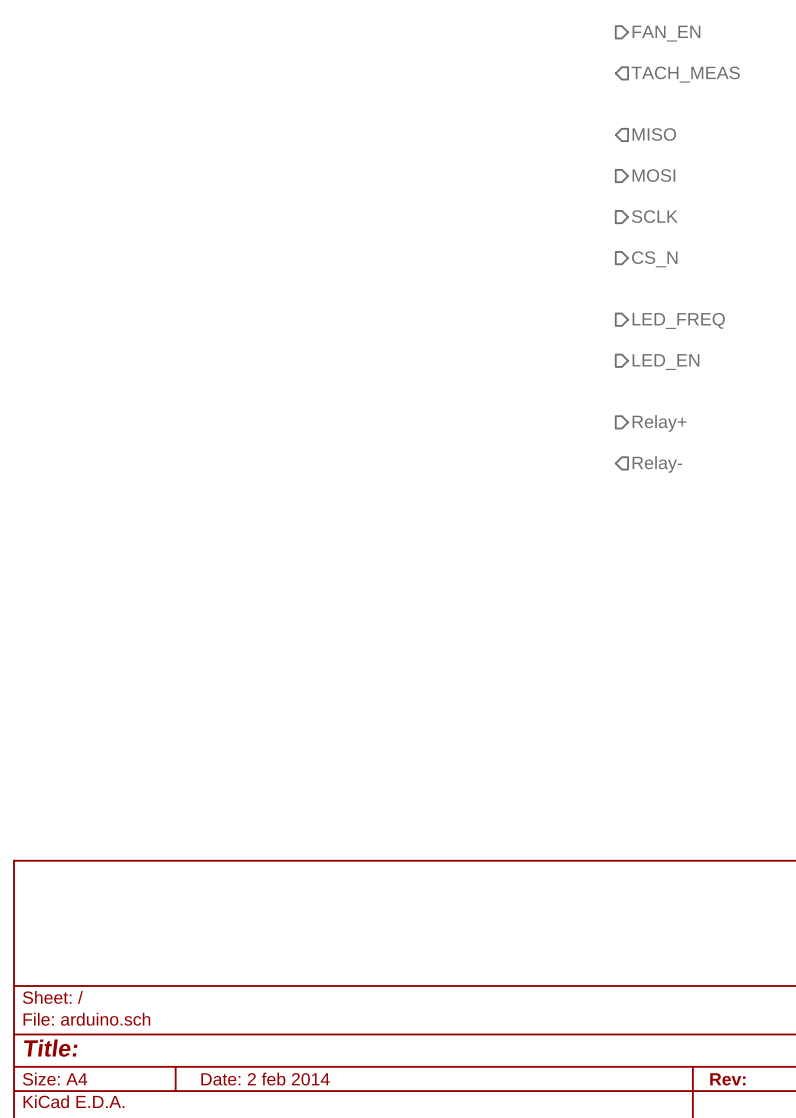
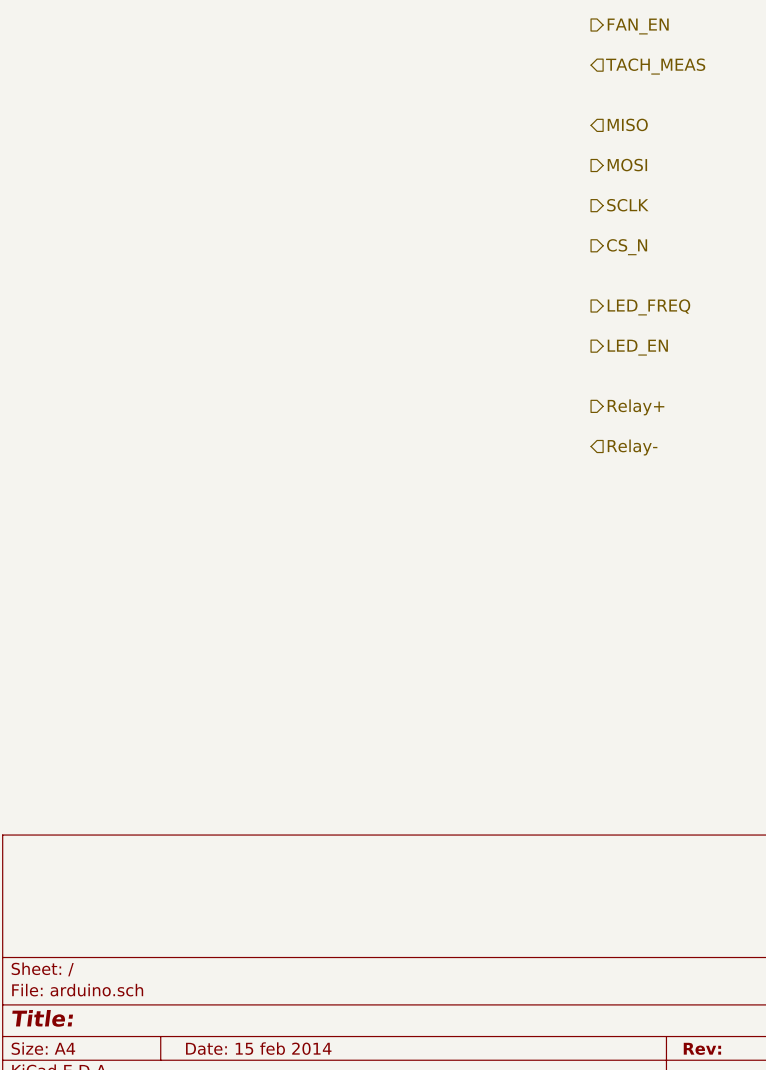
title block: Date: 2 feb 2014 (265, 1079) -> Date: 15 feb 2014 (258, 1048)

